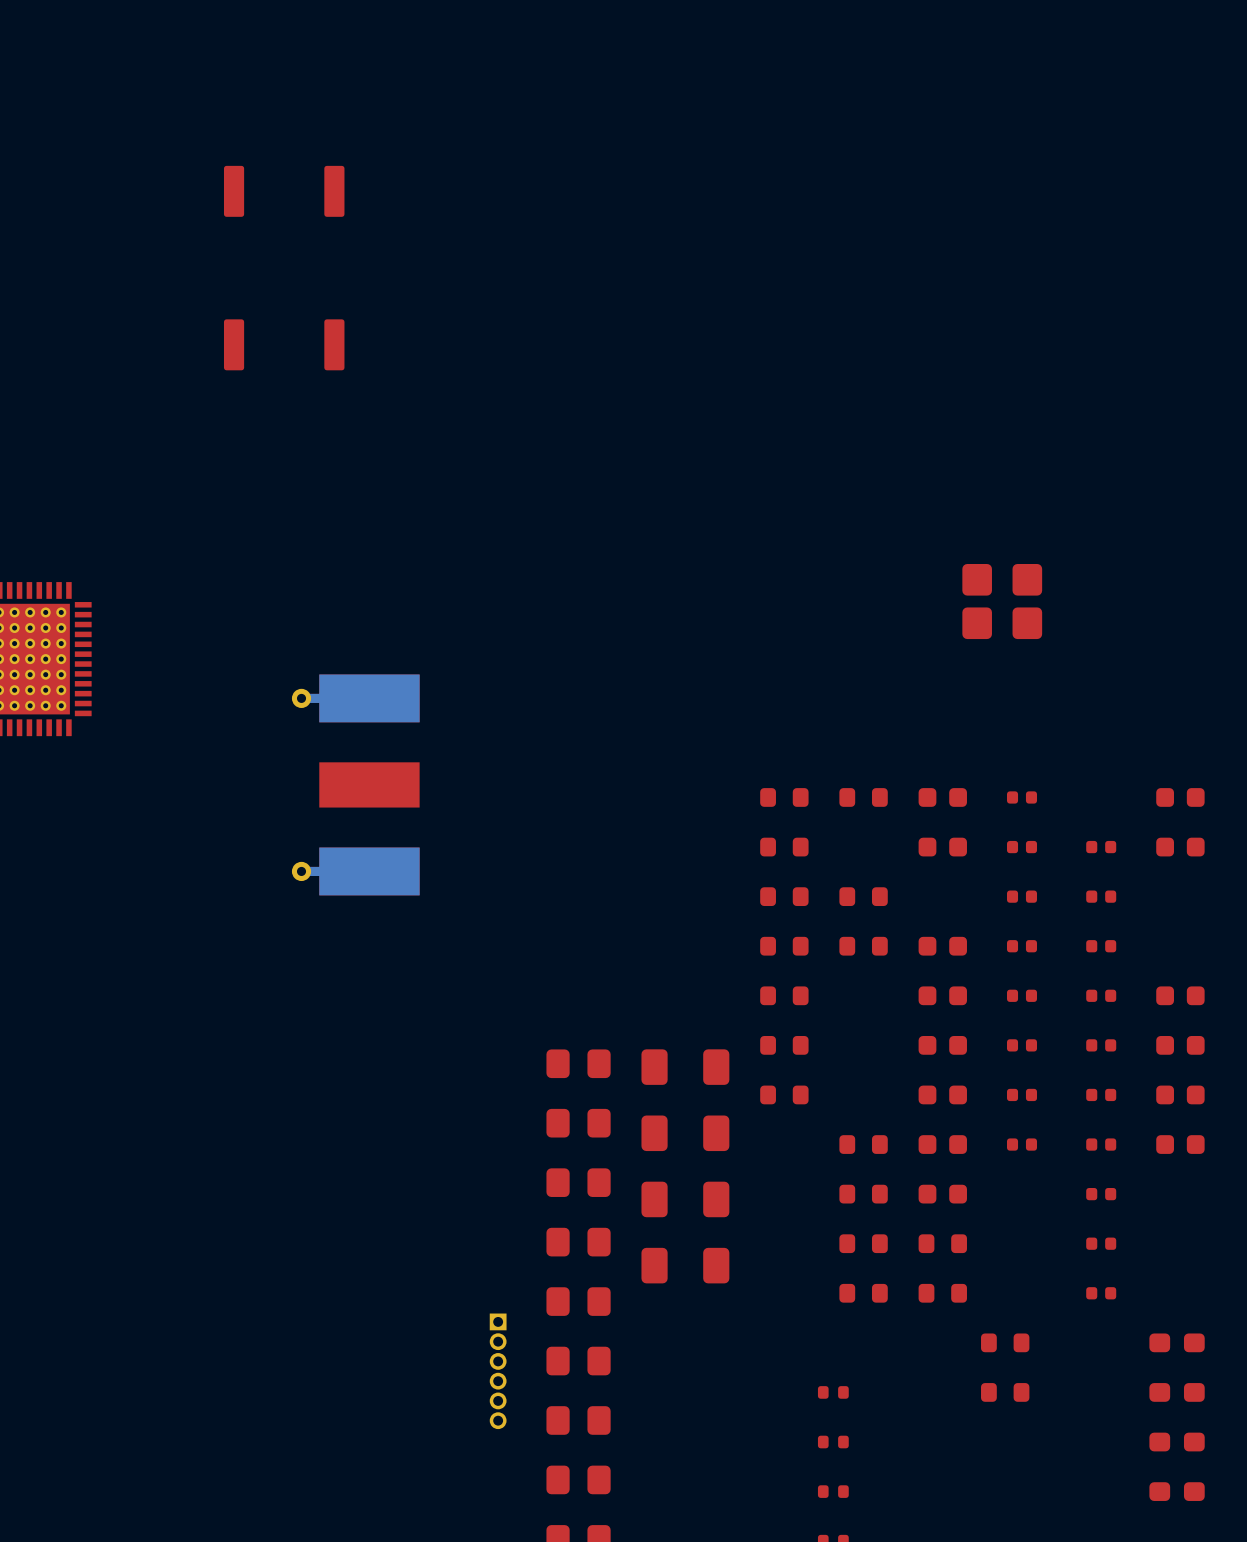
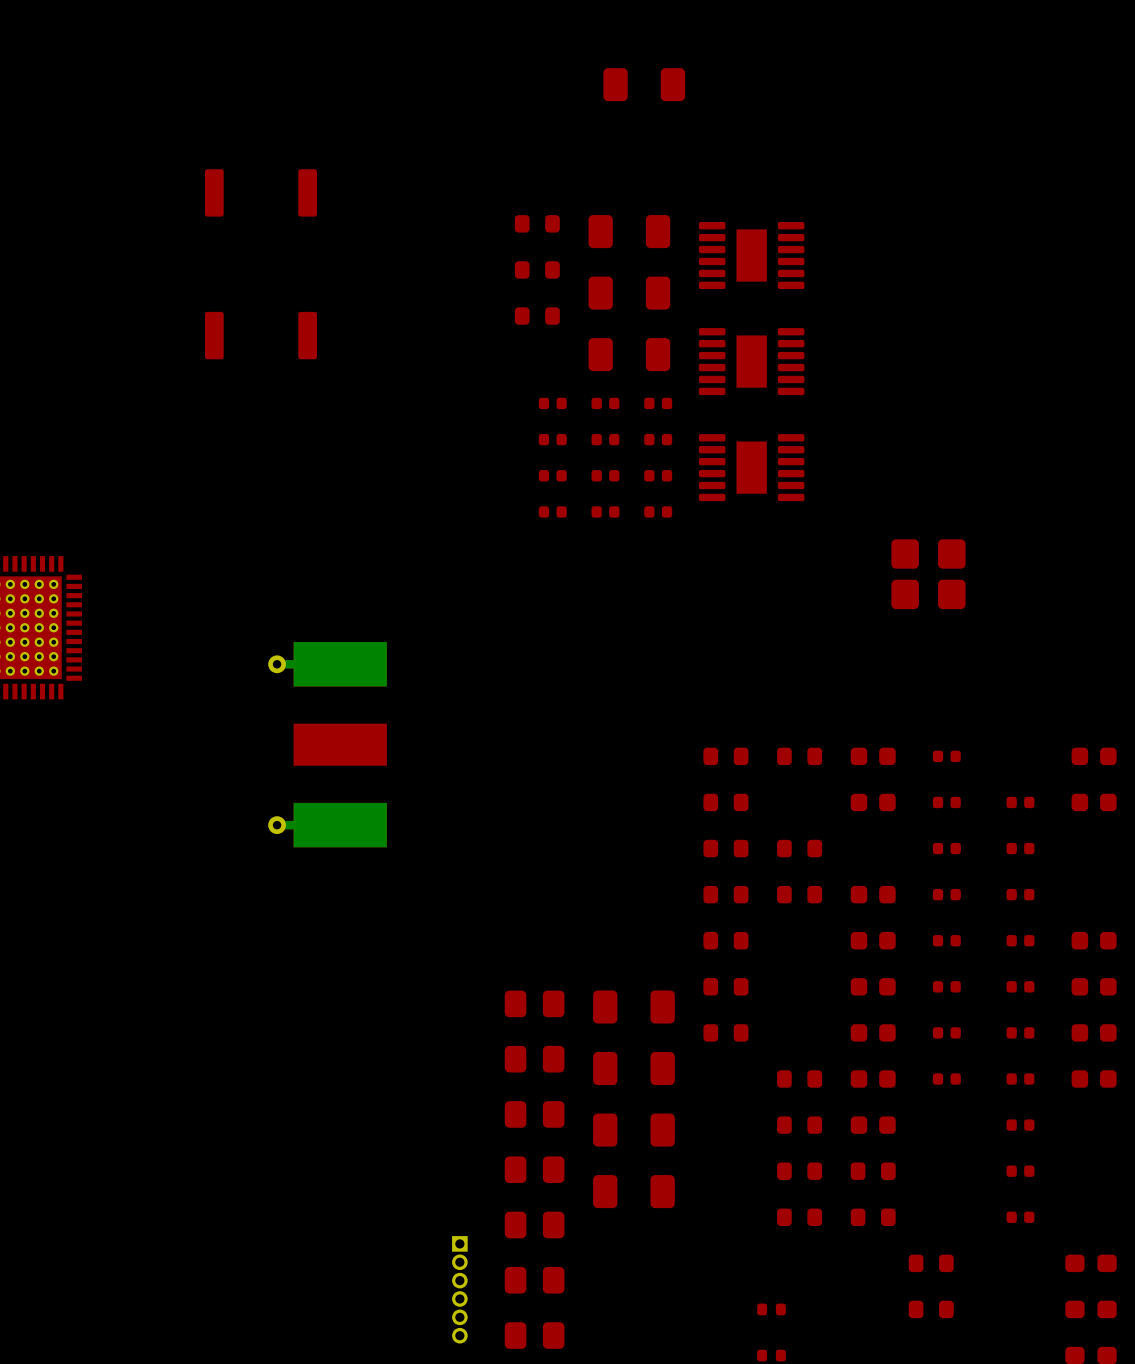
part: none -> (644, 84)
part: none -> (537, 223)
part: none -> (629, 231)
part: none -> (751, 255)
part: none -> (537, 269)
part: none -> (629, 293)
part: none -> (537, 316)
part: none -> (629, 354)
part: none -> (751, 361)
part: none -> (552, 403)
part: none -> (605, 403)
part: none -> (658, 403)
part: none -> (552, 439)
part: none -> (605, 439)
part: none -> (658, 439)
part: none -> (751, 467)
part: none -> (552, 475)
part: none -> (605, 475)
part: none -> (658, 475)
part: none -> (552, 511)
part: none -> (605, 511)
part: none -> (658, 511)

